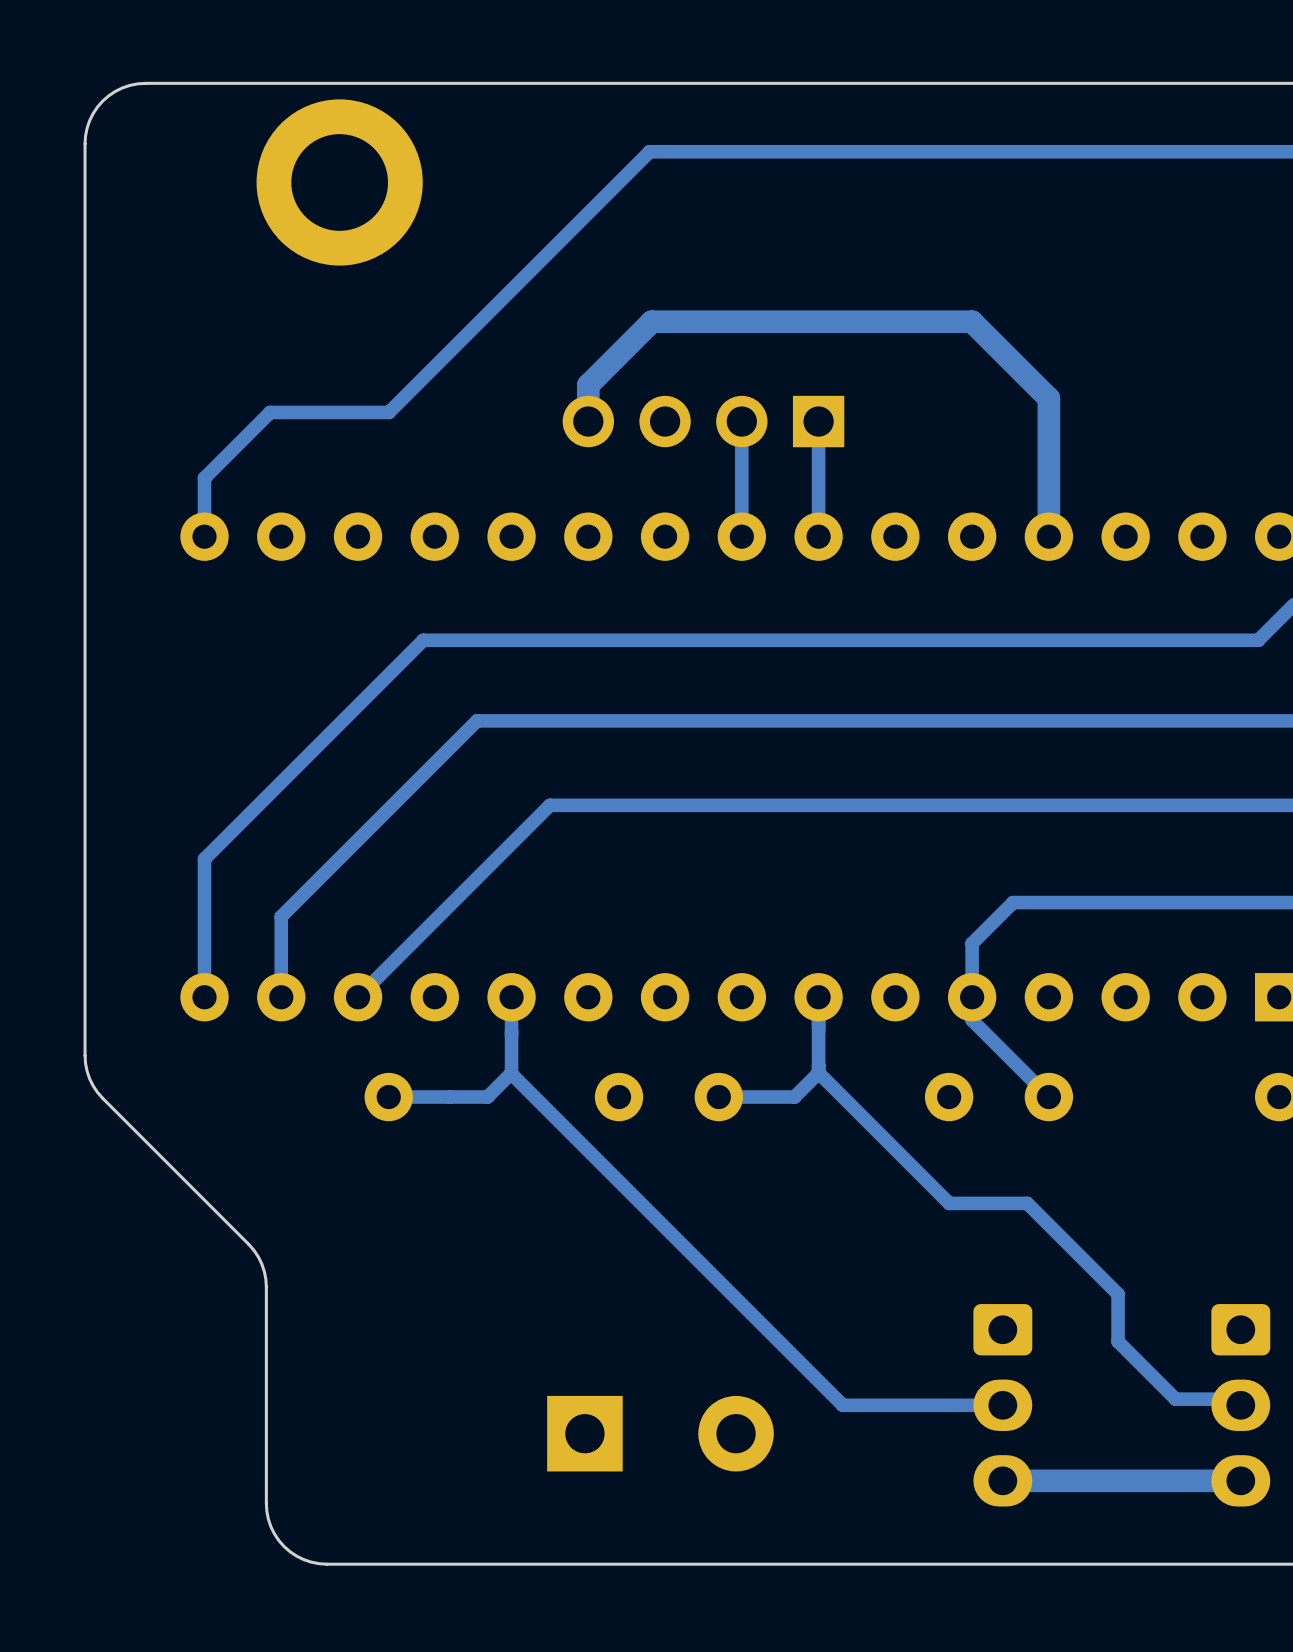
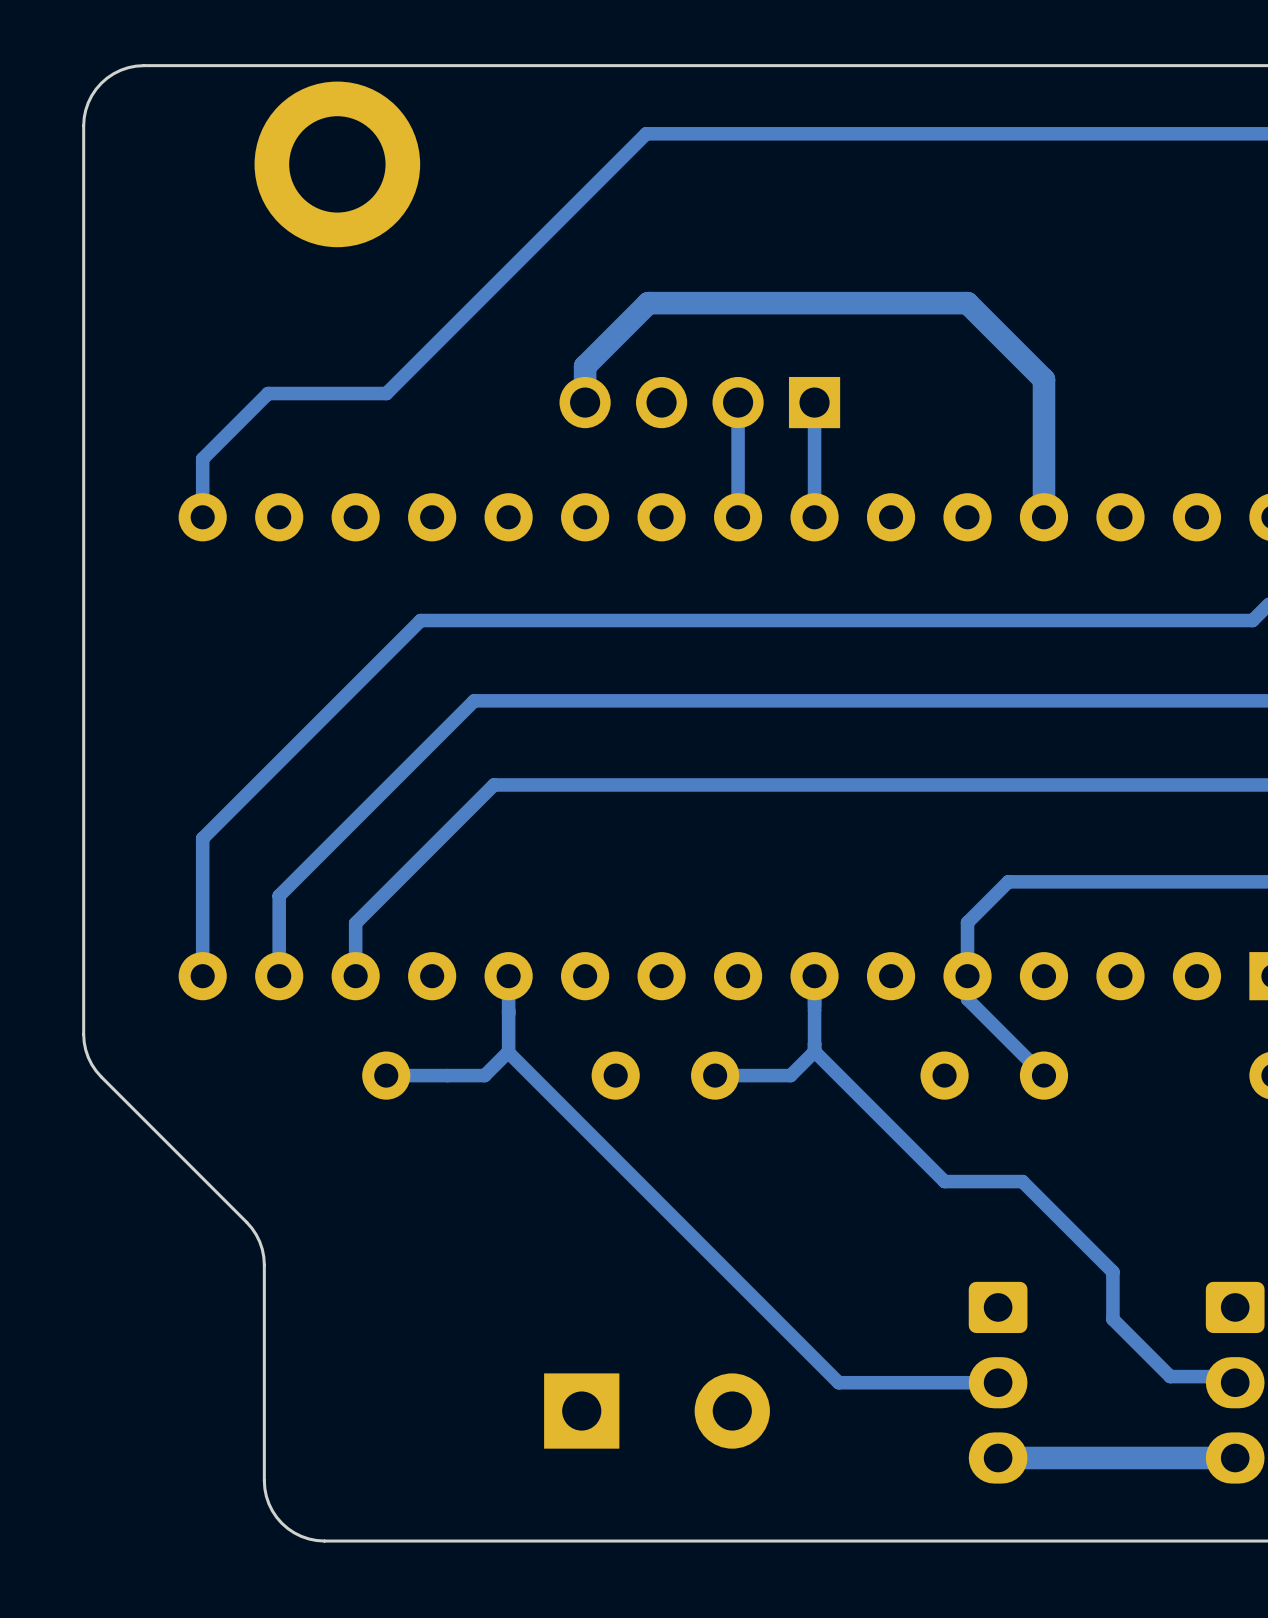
track: (549, 805) (358, 997) -> (546, 784) (493, 784) (355, 923) (355, 976)

